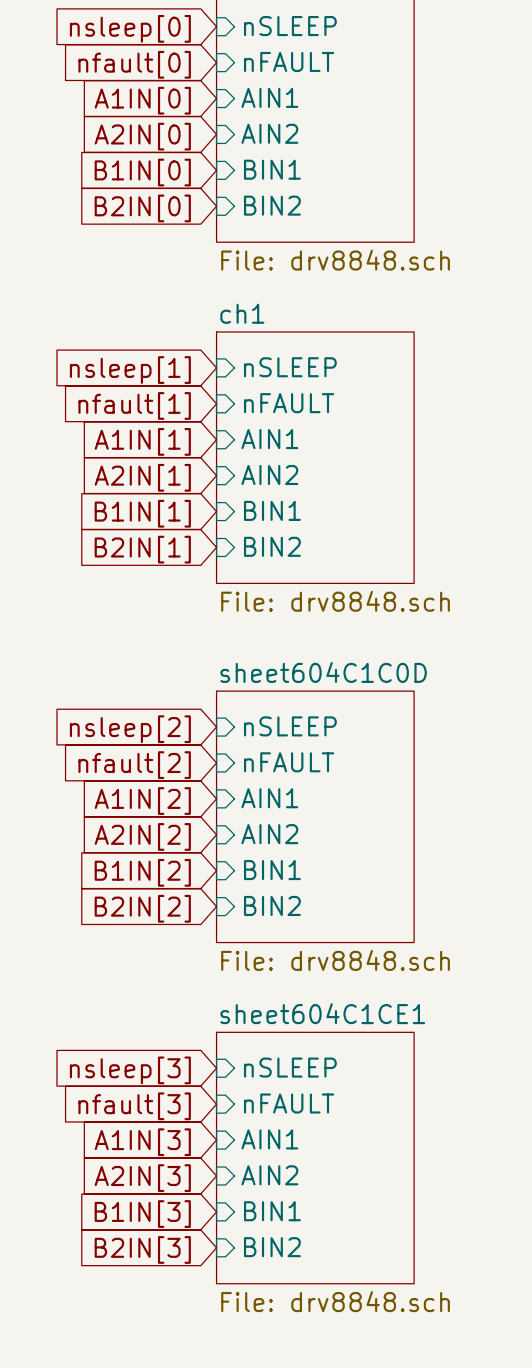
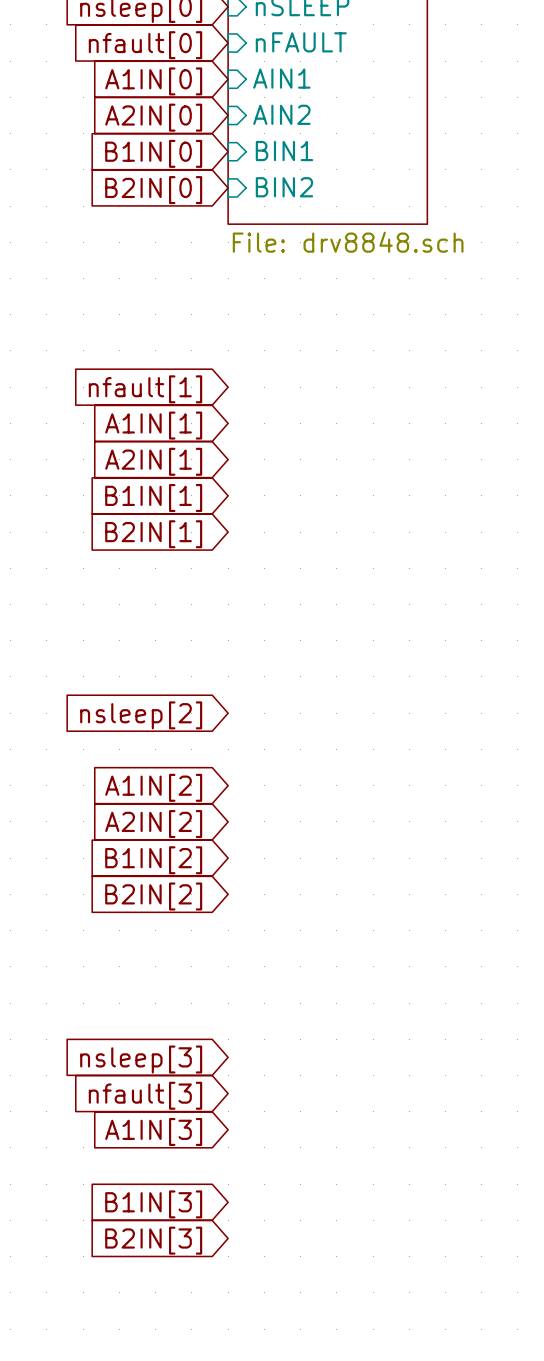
sheet pin: nSLEEP (290, 367) -> none
global label: nsleep[1] (130, 370) -> none
sheet pin: nFAULT (289, 403) -> none
sheet pin: AIN1 (269, 439) -> none
sheet ch1: File: drv8848.sch (315, 457) -> none
sheet pin: AIN2 (269, 474) -> none
sheet pin: BIN1 (272, 510) -> none
sheet pin: BIN2 (272, 546) -> none
sheet pin: nSLEEP (290, 726) -> none
sheet pin: nFAULT (289, 762) -> none
global label: nfault[2] (134, 765) -> none
sheet pin: AIN1 (269, 798) -> none
sheet sheet604C1C0D: File: drv8848.sch (315, 816) -> none
sheet pin: AIN2 (269, 834) -> none
sheet pin: BIN1 (272, 870) -> none
sheet pin: BIN2 (272, 905) -> none
sheet pin: nSLEEP (290, 1067) -> none
sheet pin: nFAULT (289, 1103) -> none
sheet pin: AIN1 (269, 1139) -> none
sheet sheet604C1CE1: File: drv8848.sch (315, 1158) -> none
sheet pin: AIN2 (269, 1175) -> none
global label: A2IN[3] (142, 1178) -> none
sheet pin: BIN1 (272, 1211) -> none
sheet pin: BIN2 (272, 1247) -> none

